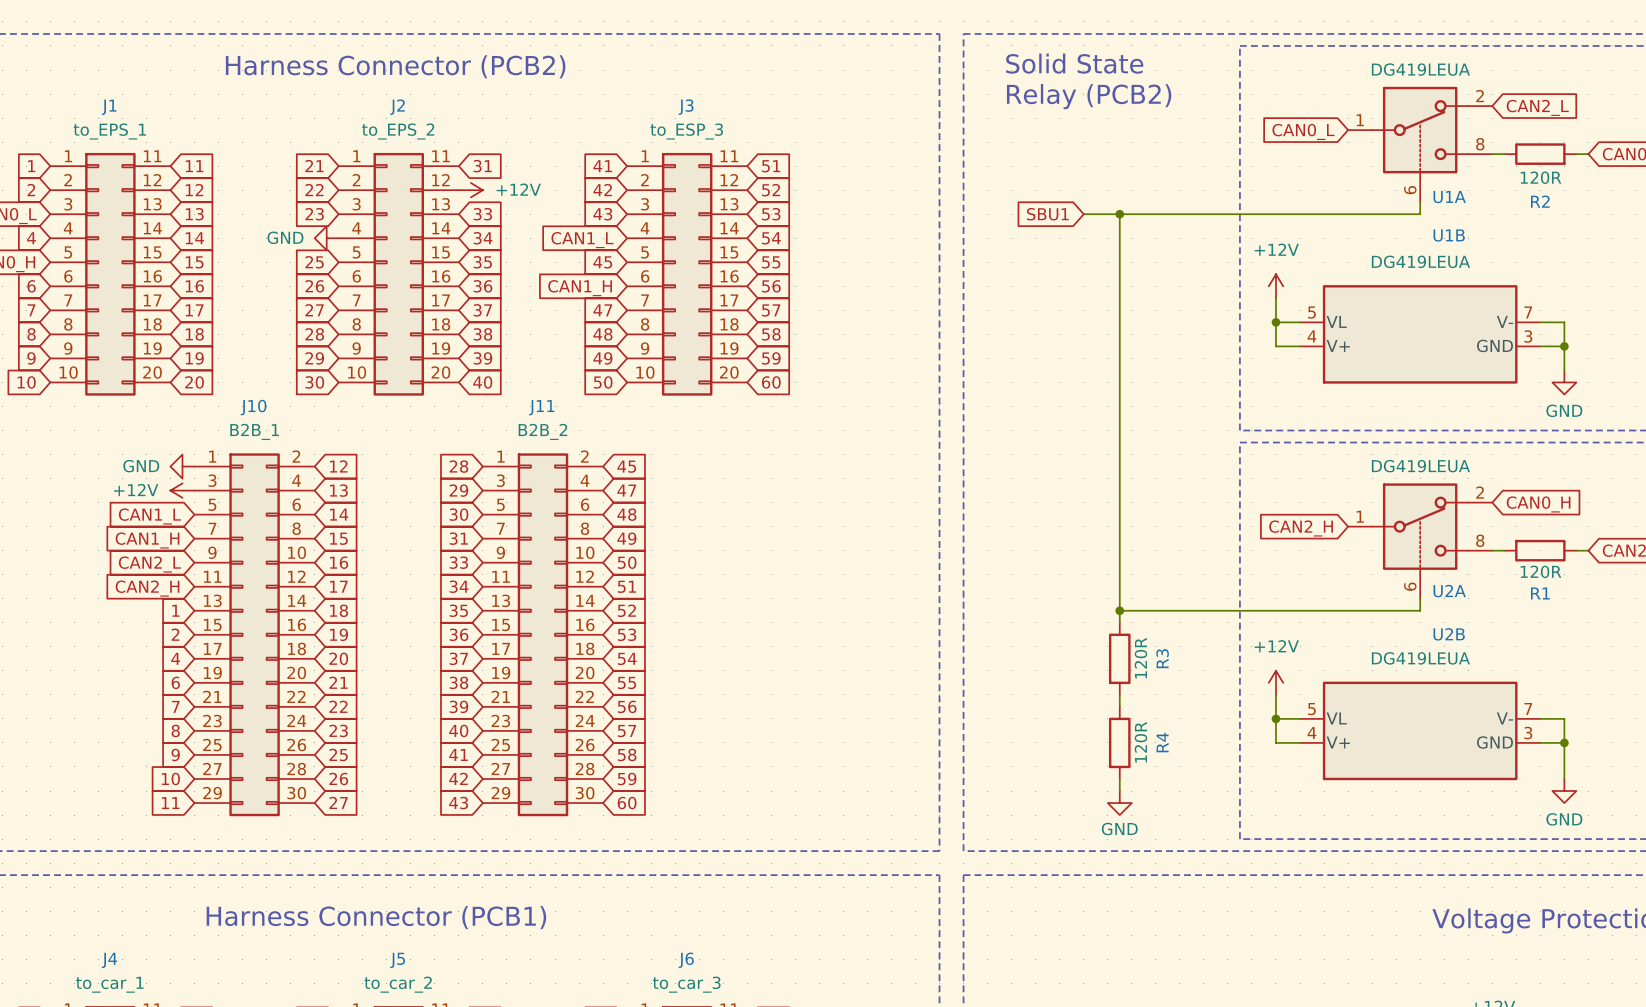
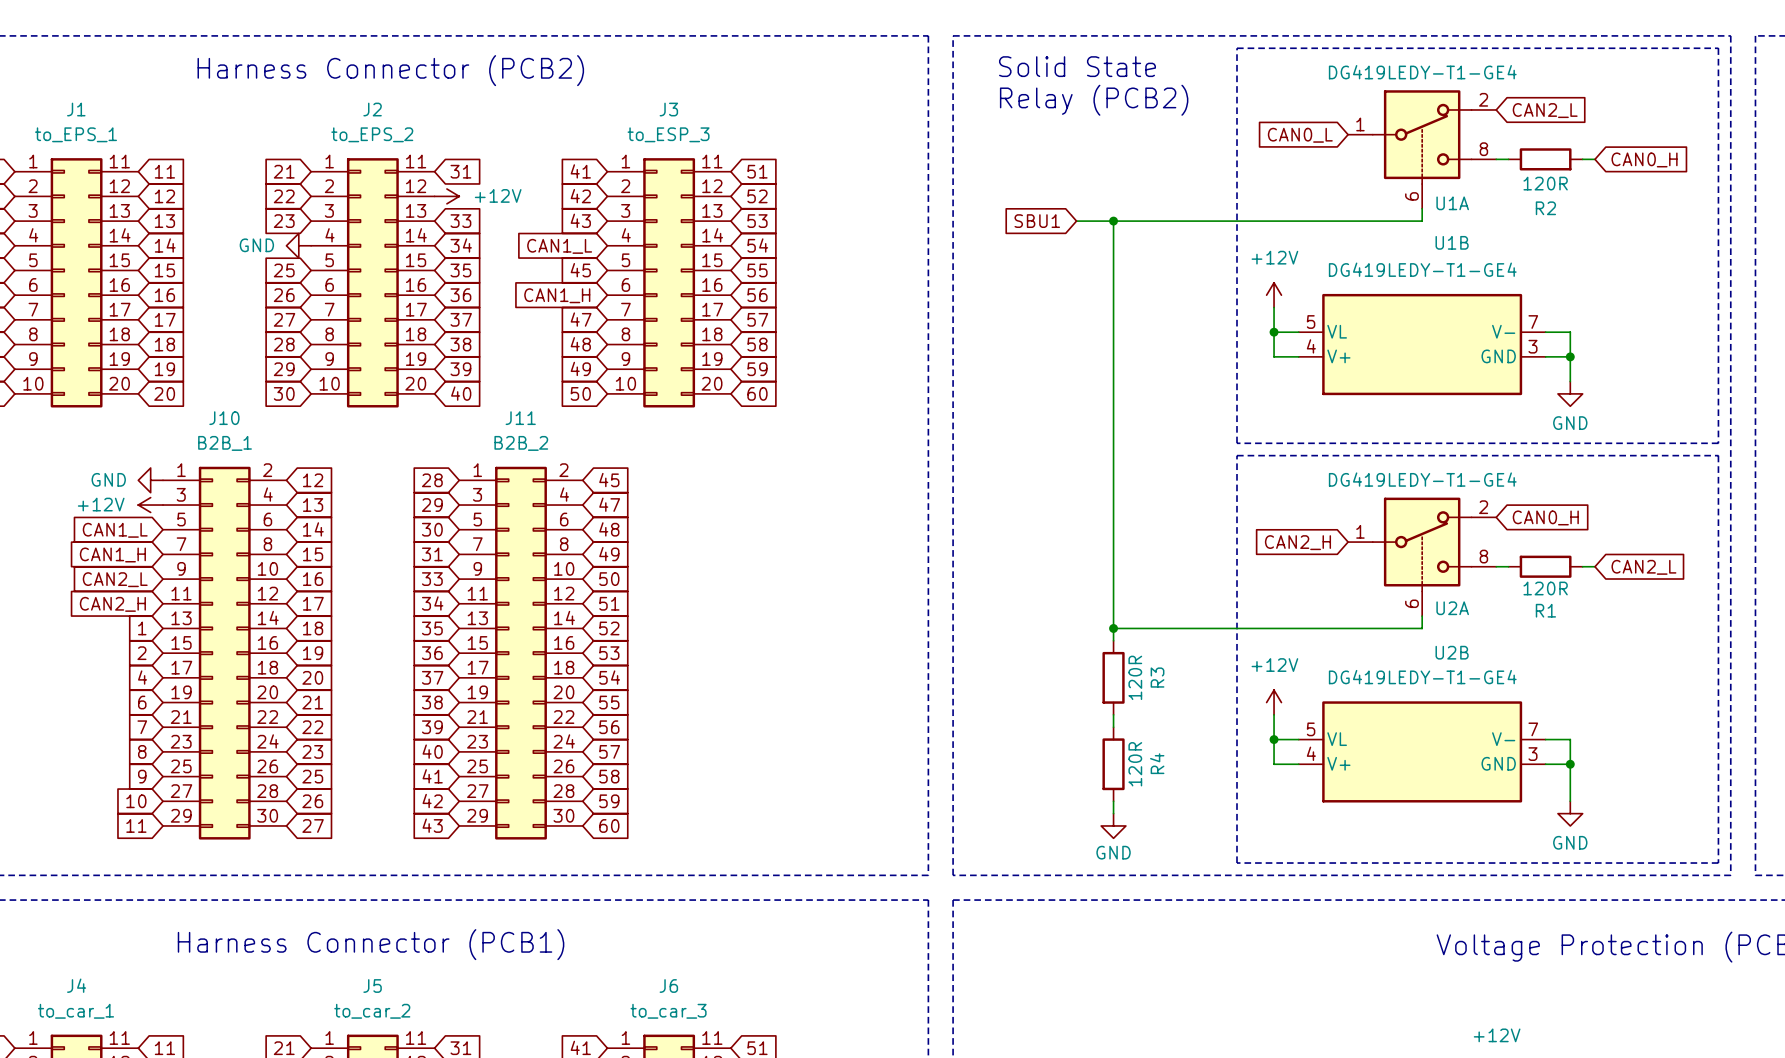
U1A value: DG419LEUA (1420, 69) -> DG419LEDY-T1-GE4 (1422, 72)
U1B value: DG419LEUA (1420, 261) -> DG419LEDY-T1-GE4 (1422, 269)
U2A value: DG419LEUA (1420, 466) -> DG419LEDY-T1-GE4 (1422, 479)
U2B value: DG419LEUA (1420, 658) -> DG419LEDY-T1-GE4 (1422, 677)

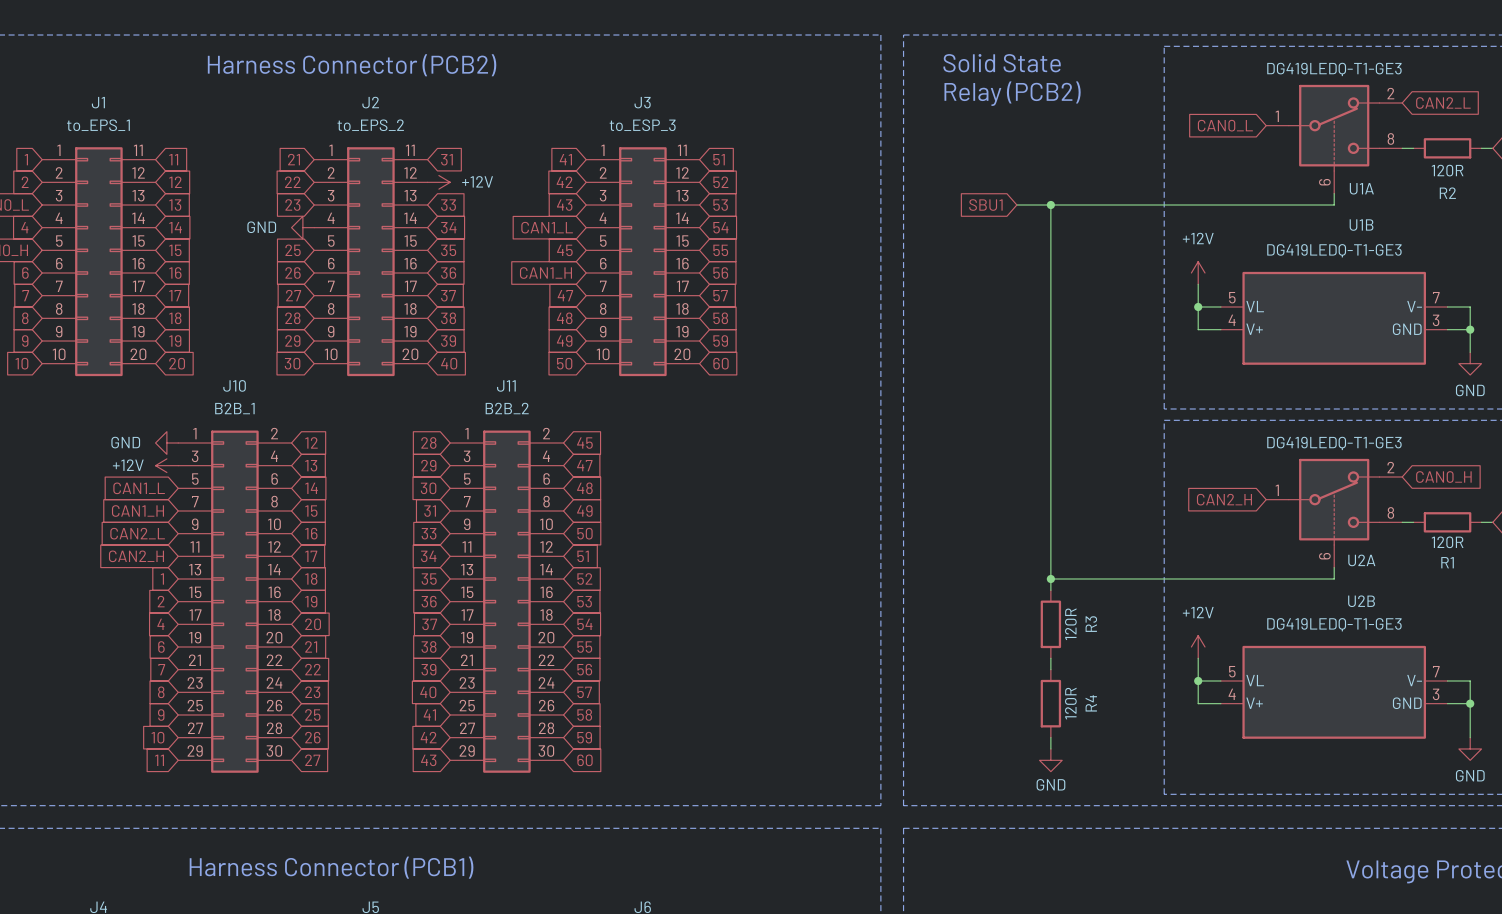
U1A value: DG419LEDY-T1-GE4 (1422, 72) -> DG419LEDQ-T1-GE3 (1334, 69)
U1B value: DG419LEDY-T1-GE4 (1422, 269) -> DG419LEDQ-T1-GE3 (1334, 250)
U2A value: DG419LEDY-T1-GE4 (1422, 479) -> DG419LEDQ-T1-GE3 (1334, 443)
U2B value: DG419LEDY-T1-GE4 (1422, 677) -> DG419LEDQ-T1-GE3 (1334, 624)

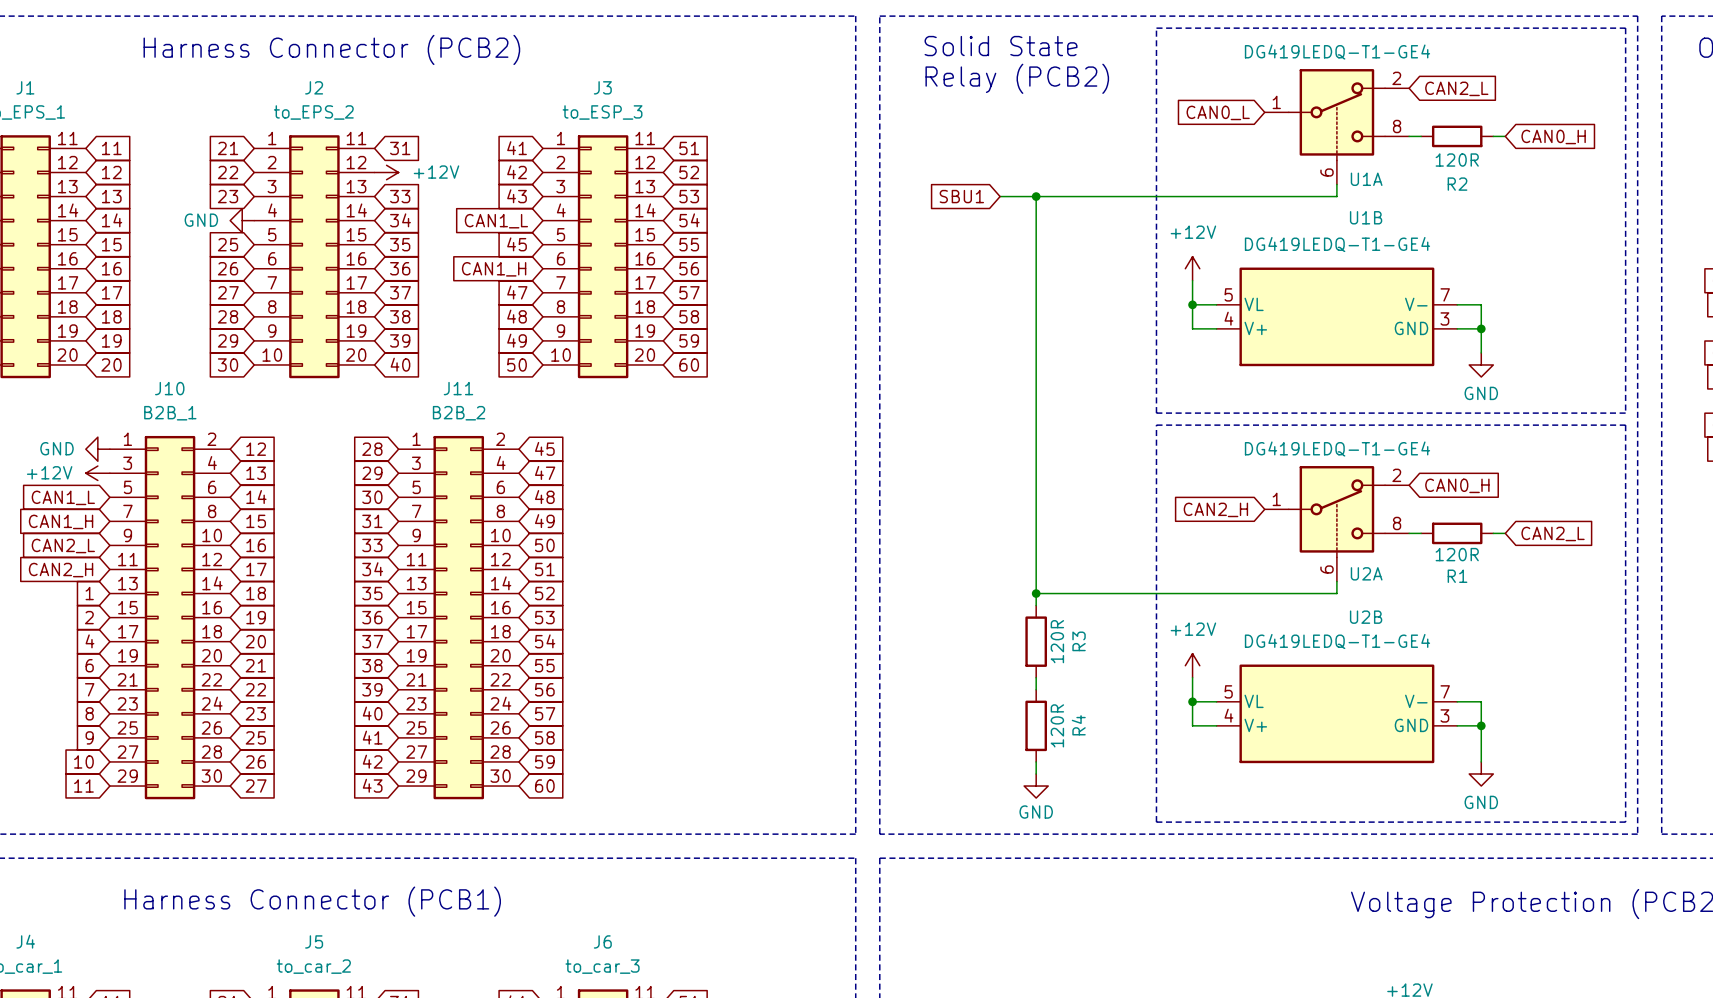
U1A value: DG419LEDQ-T1-GE3 (1334, 69) -> DG419LEDQ-T1-GE4 (1337, 52)
U1B value: DG419LEDQ-T1-GE3 (1334, 250) -> DG419LEDQ-T1-GE4 (1337, 244)
U2A value: DG419LEDQ-T1-GE3 (1334, 443) -> DG419LEDQ-T1-GE4 (1337, 449)
U2B value: DG419LEDQ-T1-GE3 (1334, 624) -> DG419LEDQ-T1-GE4 (1337, 641)

